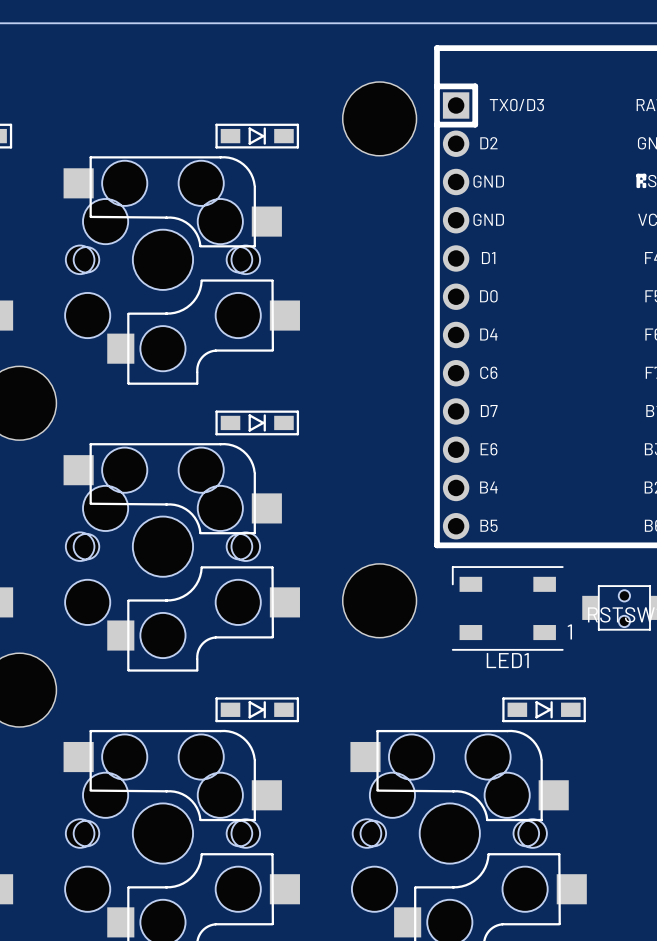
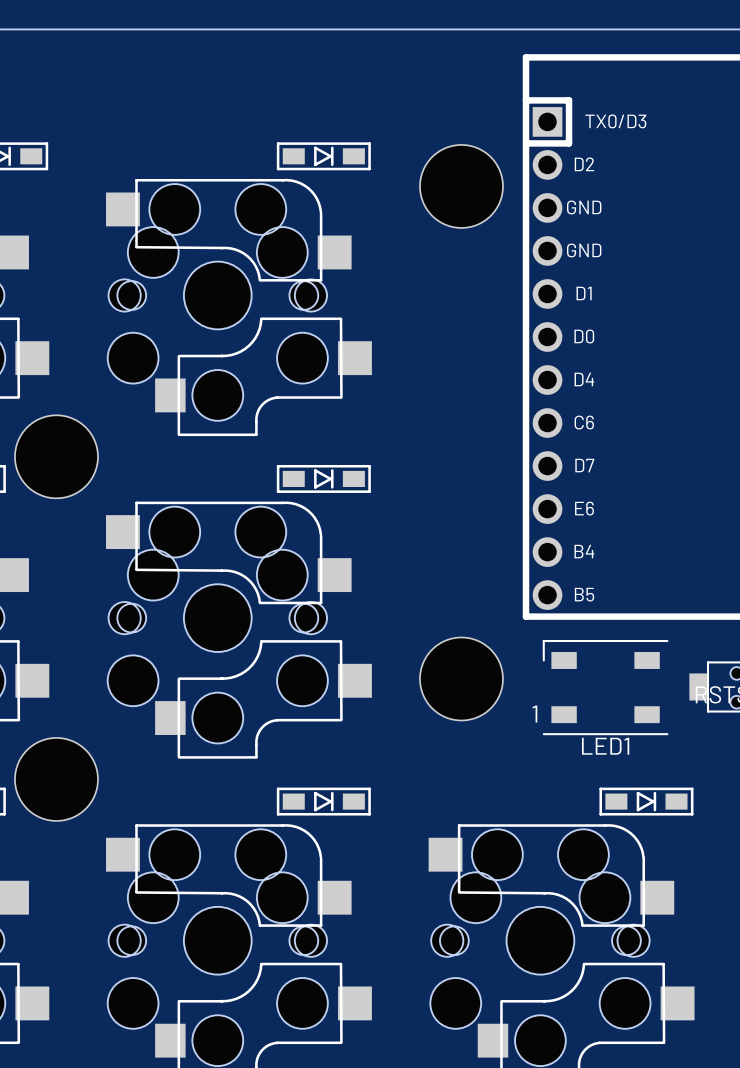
part position: (379, 118) -> (461, 186)
LED1 text position: 1 (569, 631) -> 1 (534, 714)

